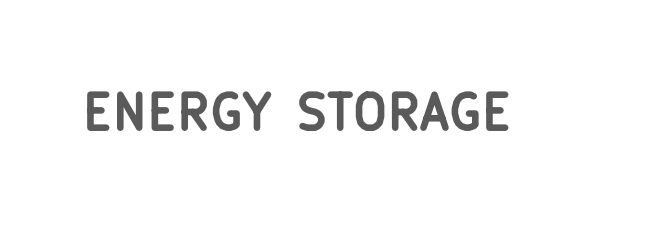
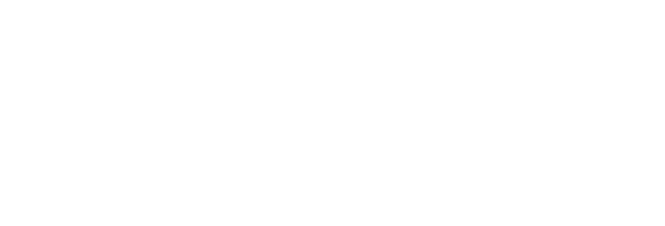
text: ENERGY STORAGE (297, 111) -> none

